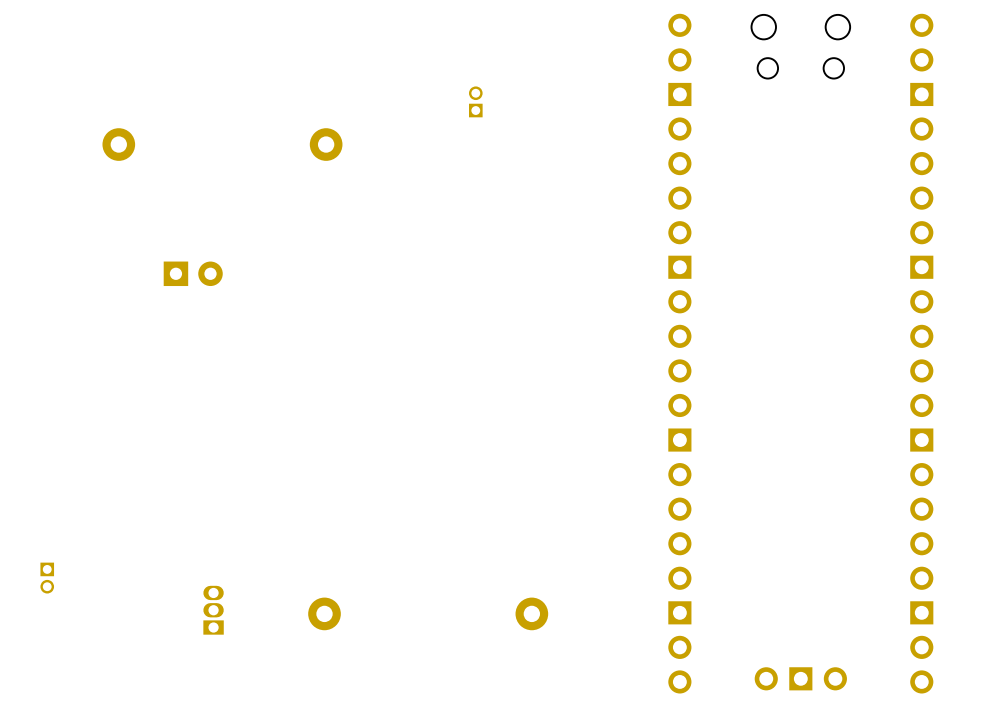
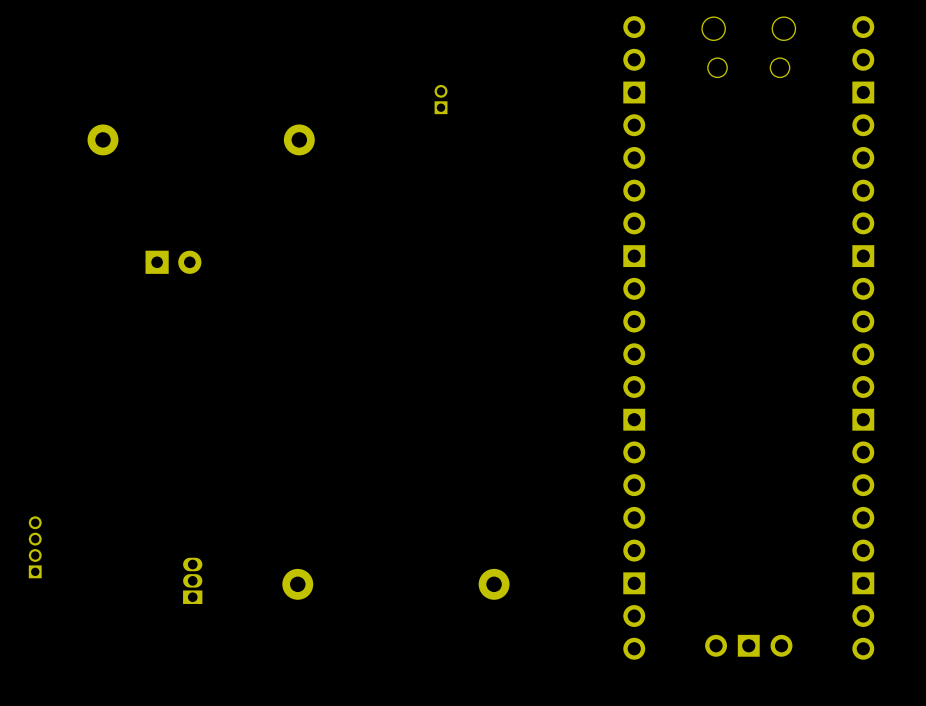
part footprint: [40, 562, 55, 594] -> [28, 516, 42, 579]

